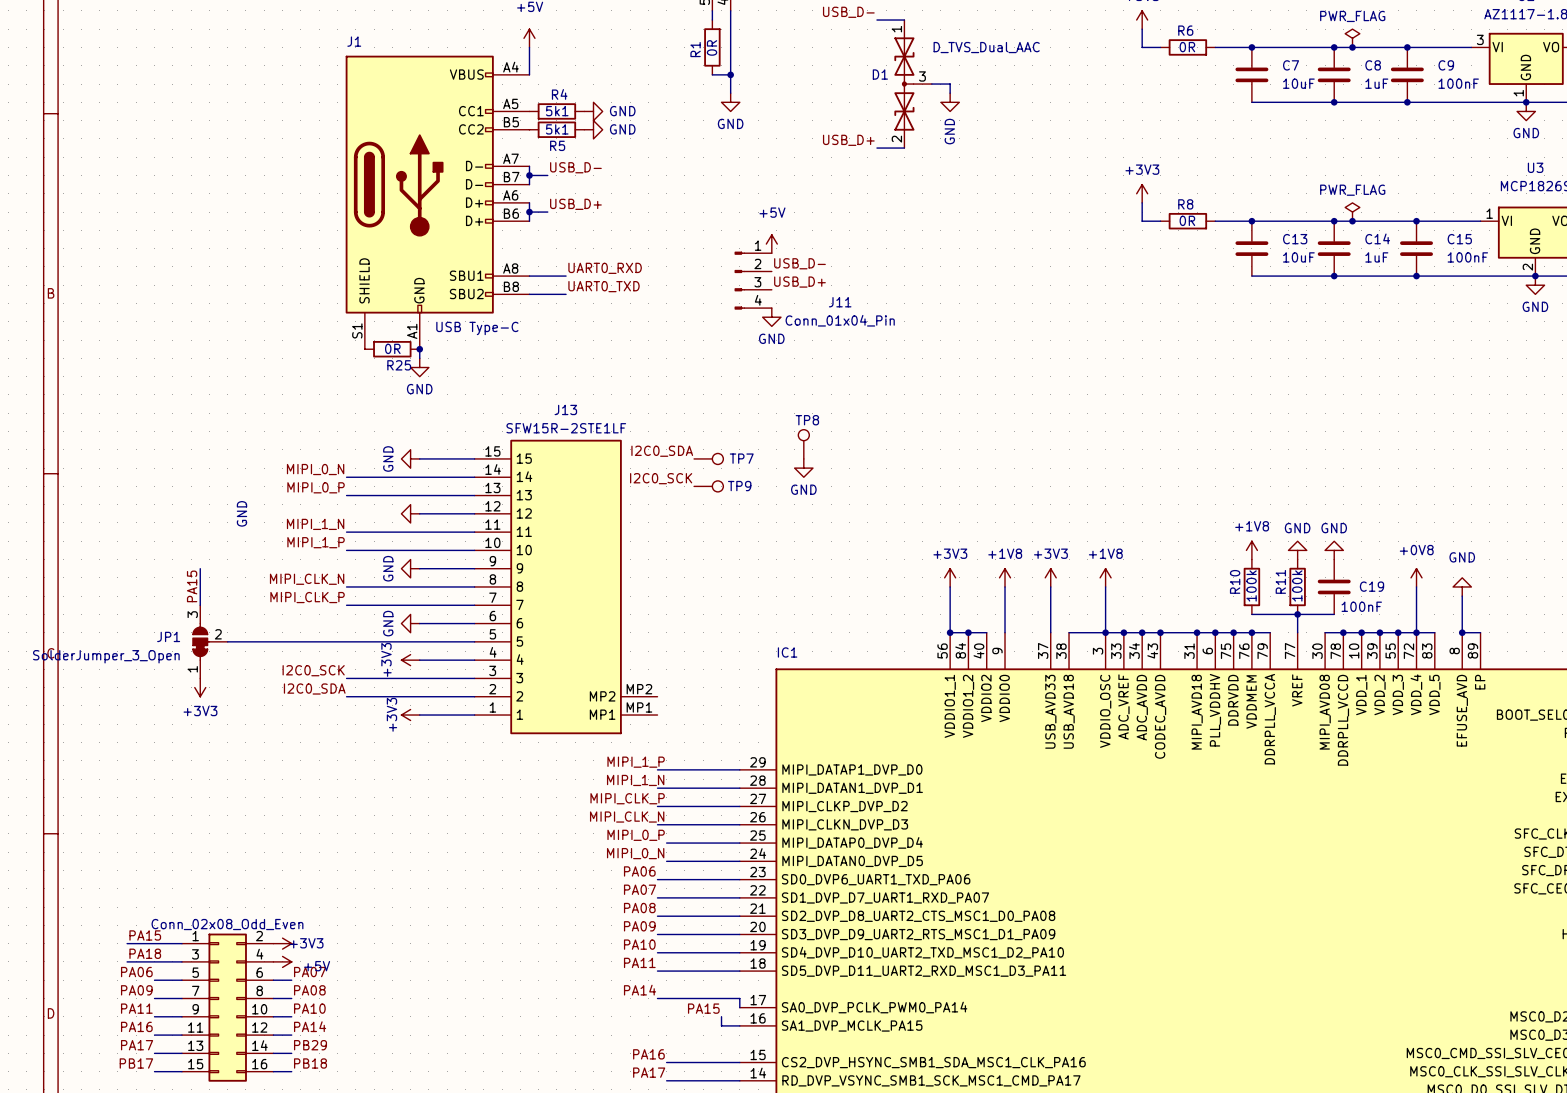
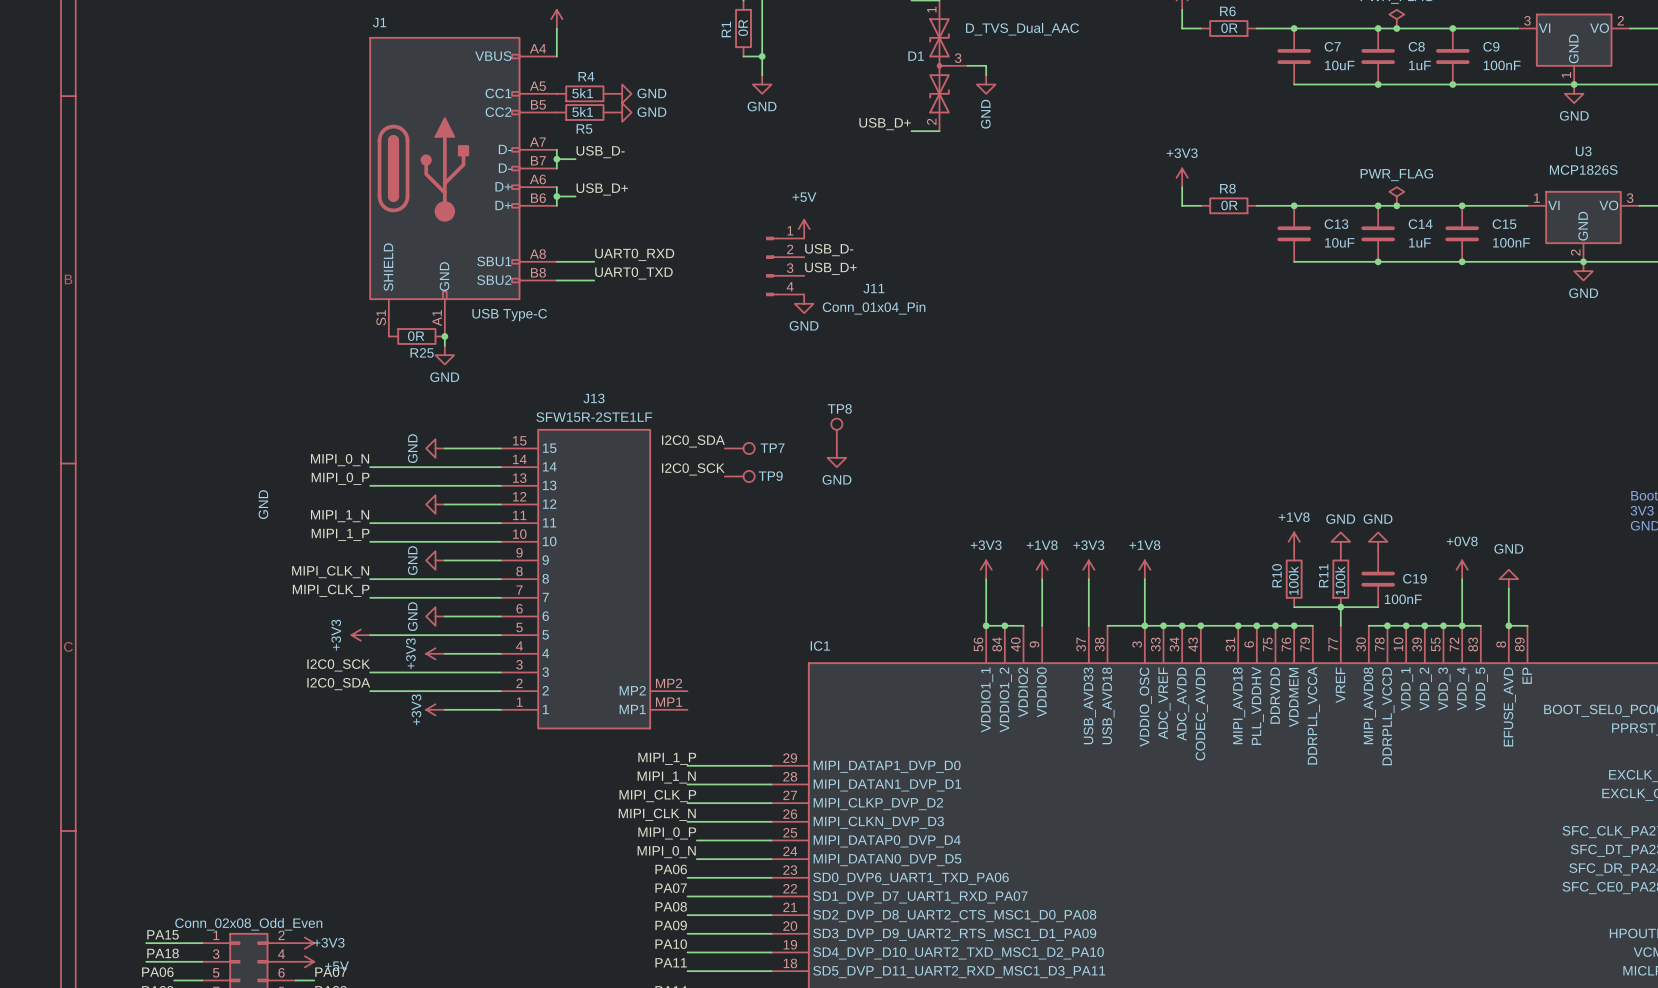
wire: (200, 568) (200, 605) -> none
label: PA15 (192, 586) -> none
JP1: SolderJumper_3_Open (210, 641) -> none
wire: (227, 641) (346, 641) -> none
power symbol rotation: 0° (200, 687) -> 90° clockwise (360, 635)
power symbol position: +3V3 (200, 687) -> +3V3 (360, 635)

